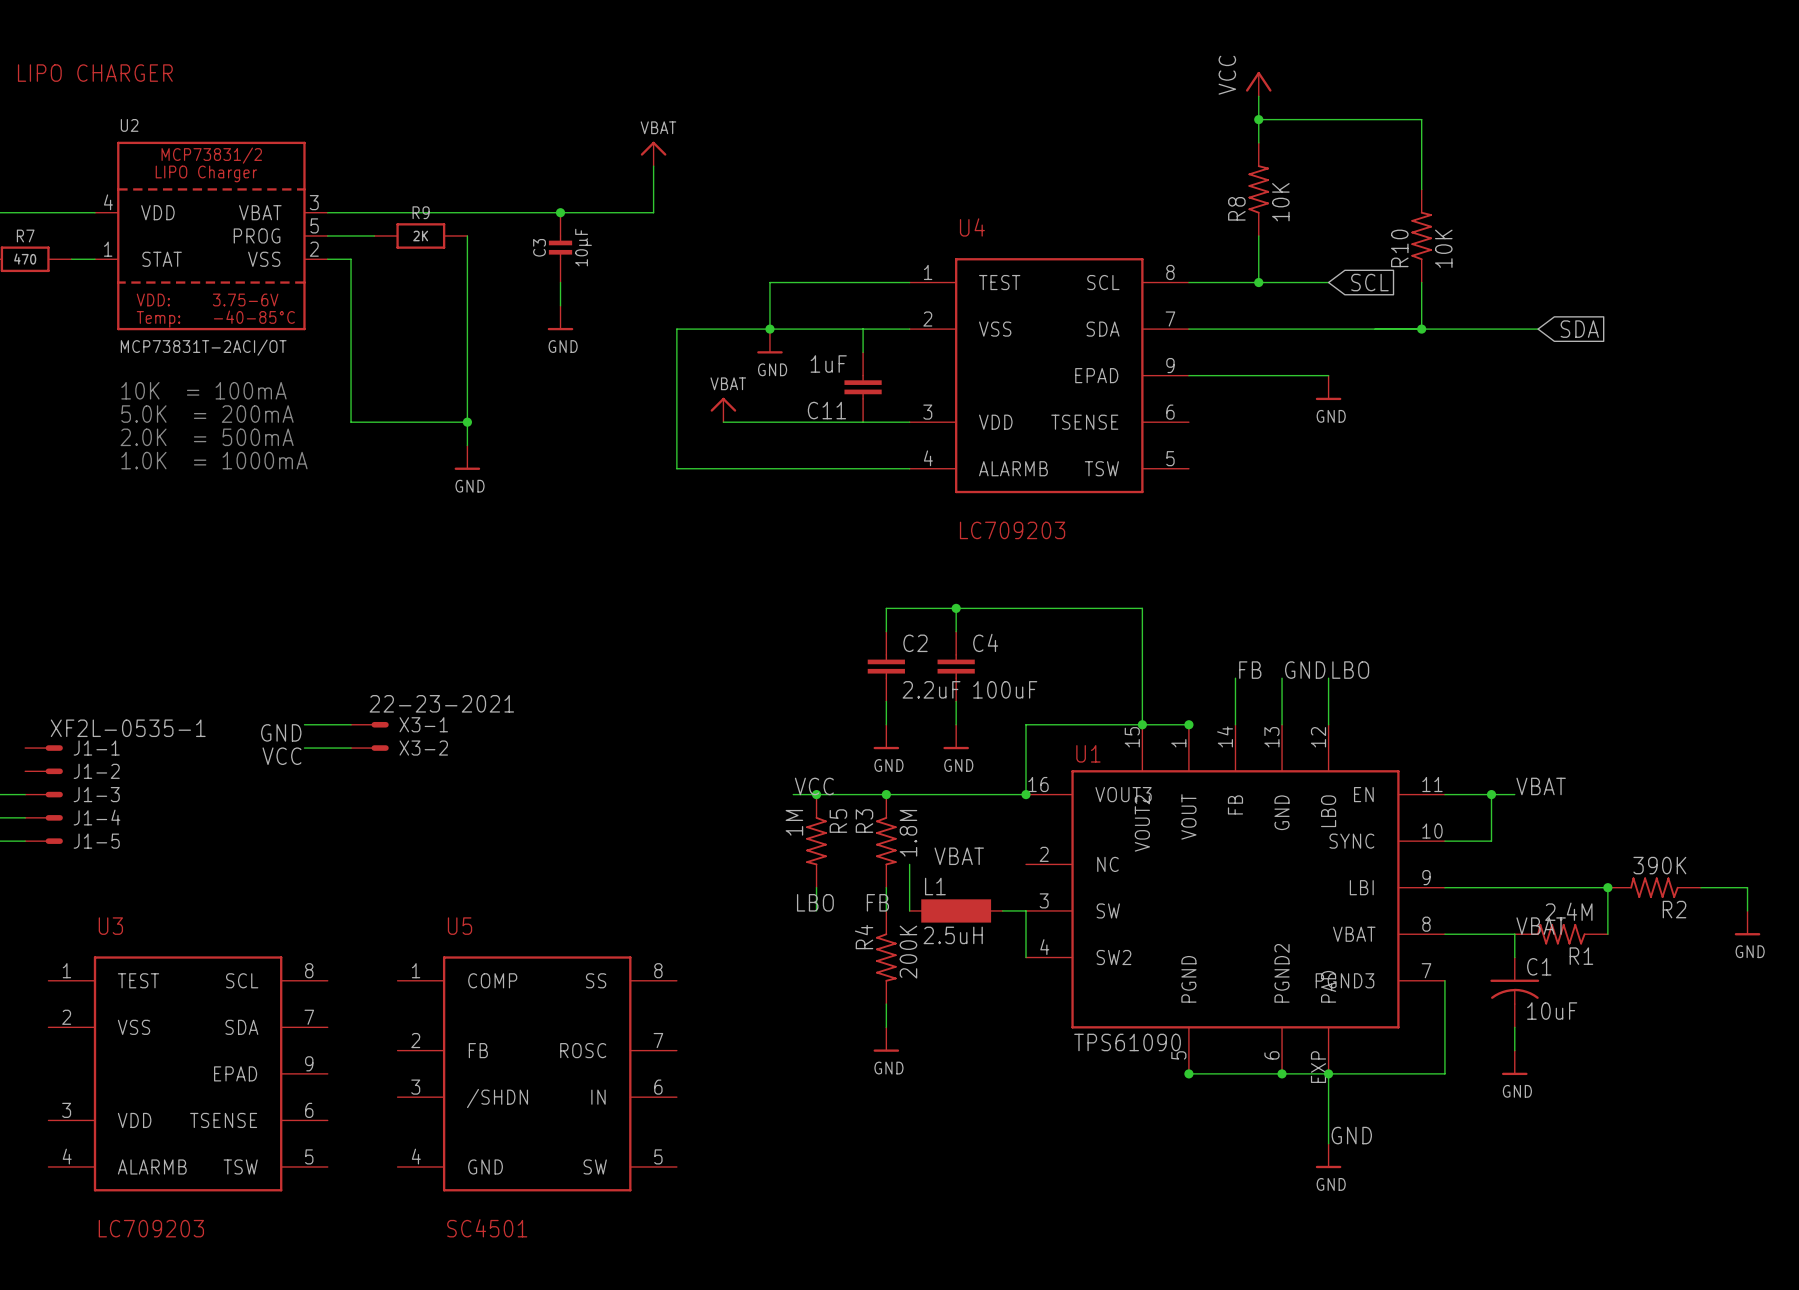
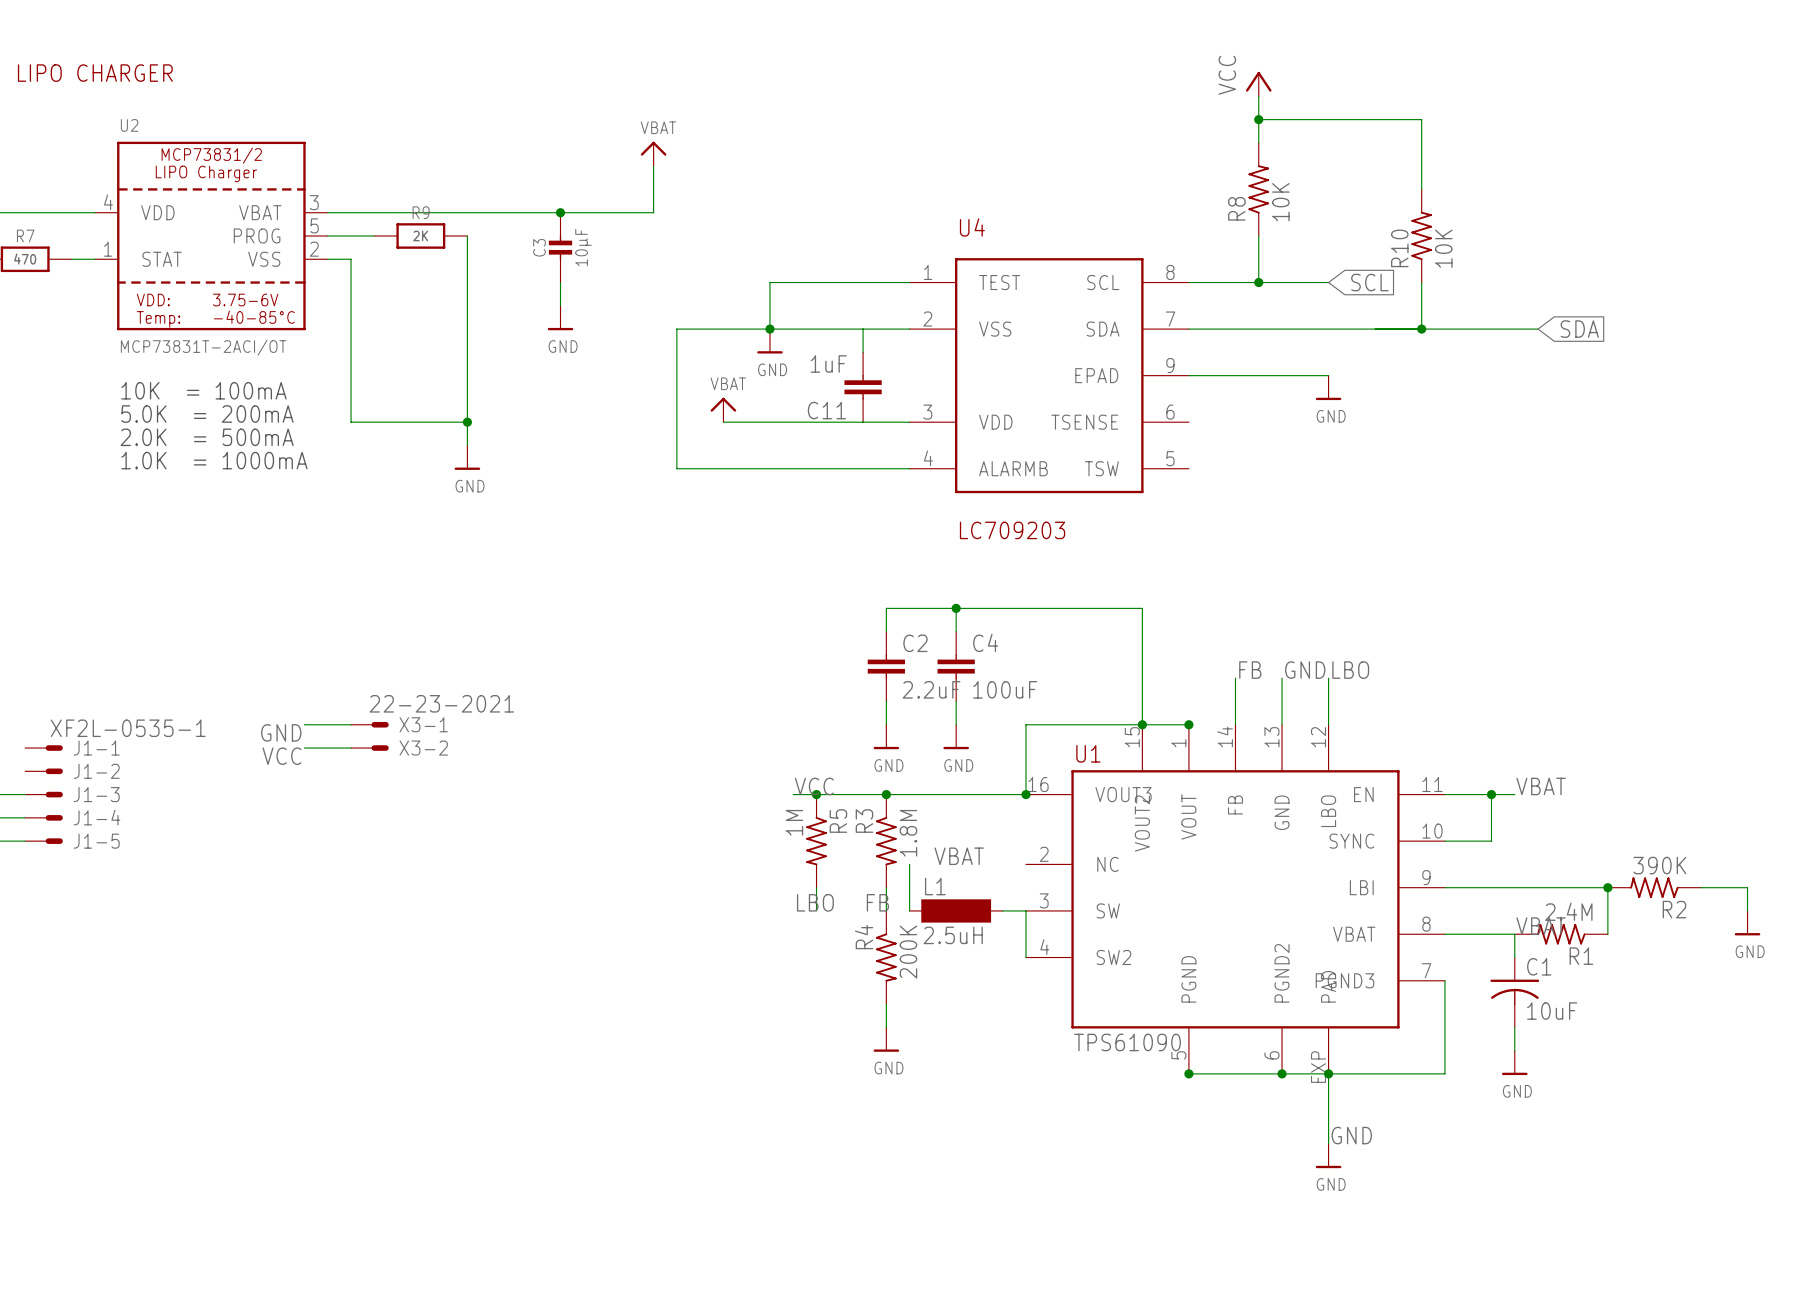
U3: LC709203 (188, 1073) -> none
U5: SC4501 (537, 1073) -> none

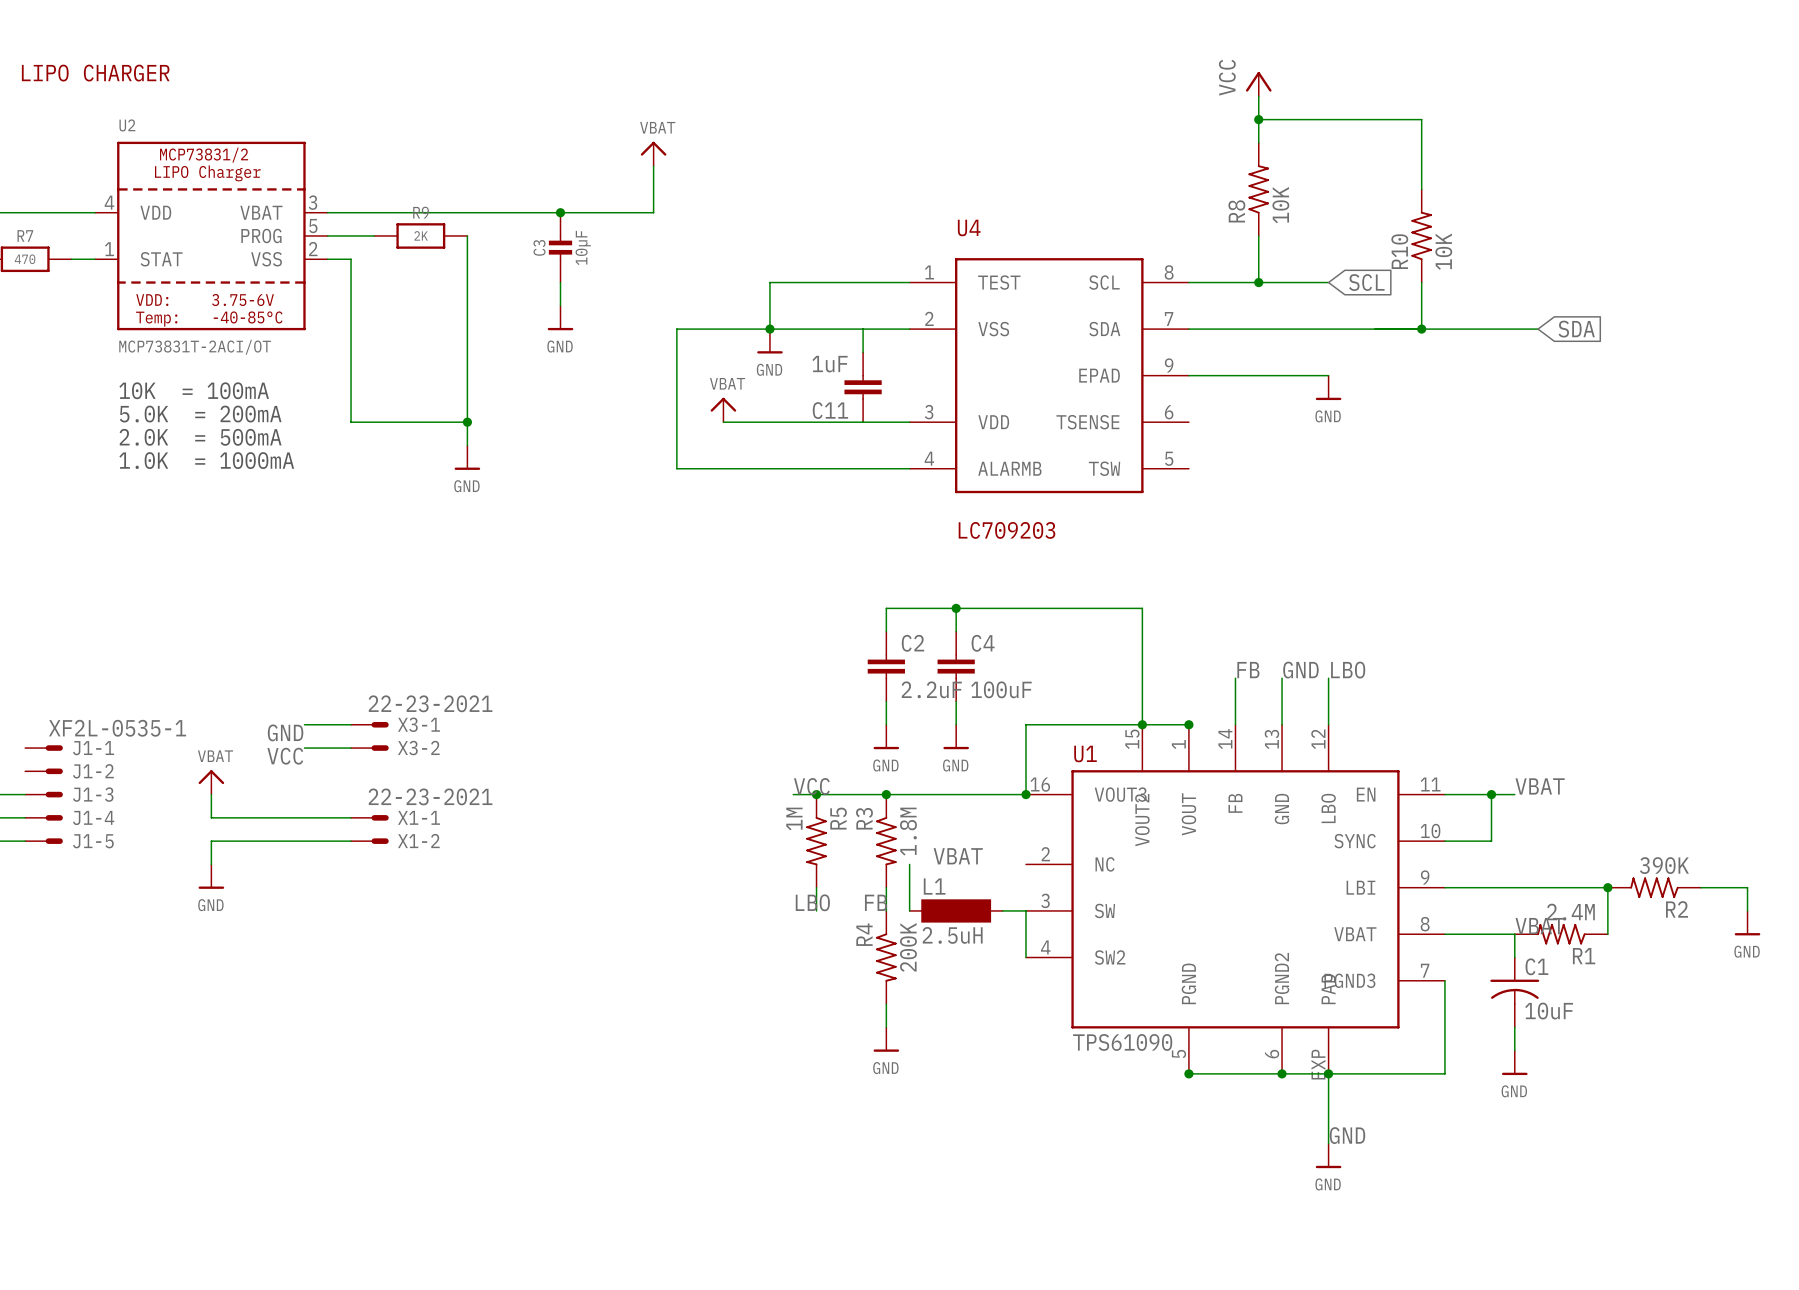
power symbol: none -> VBAT (211, 782)
wire: none -> (211, 794) (211, 817) (351, 817)
X1-1: none -> 22-23-2021 (369, 817)
wire: none -> (351, 841) (211, 841) (211, 864)
X1-2: none -> (369, 841)
power symbol: none -> GND (211, 876)

